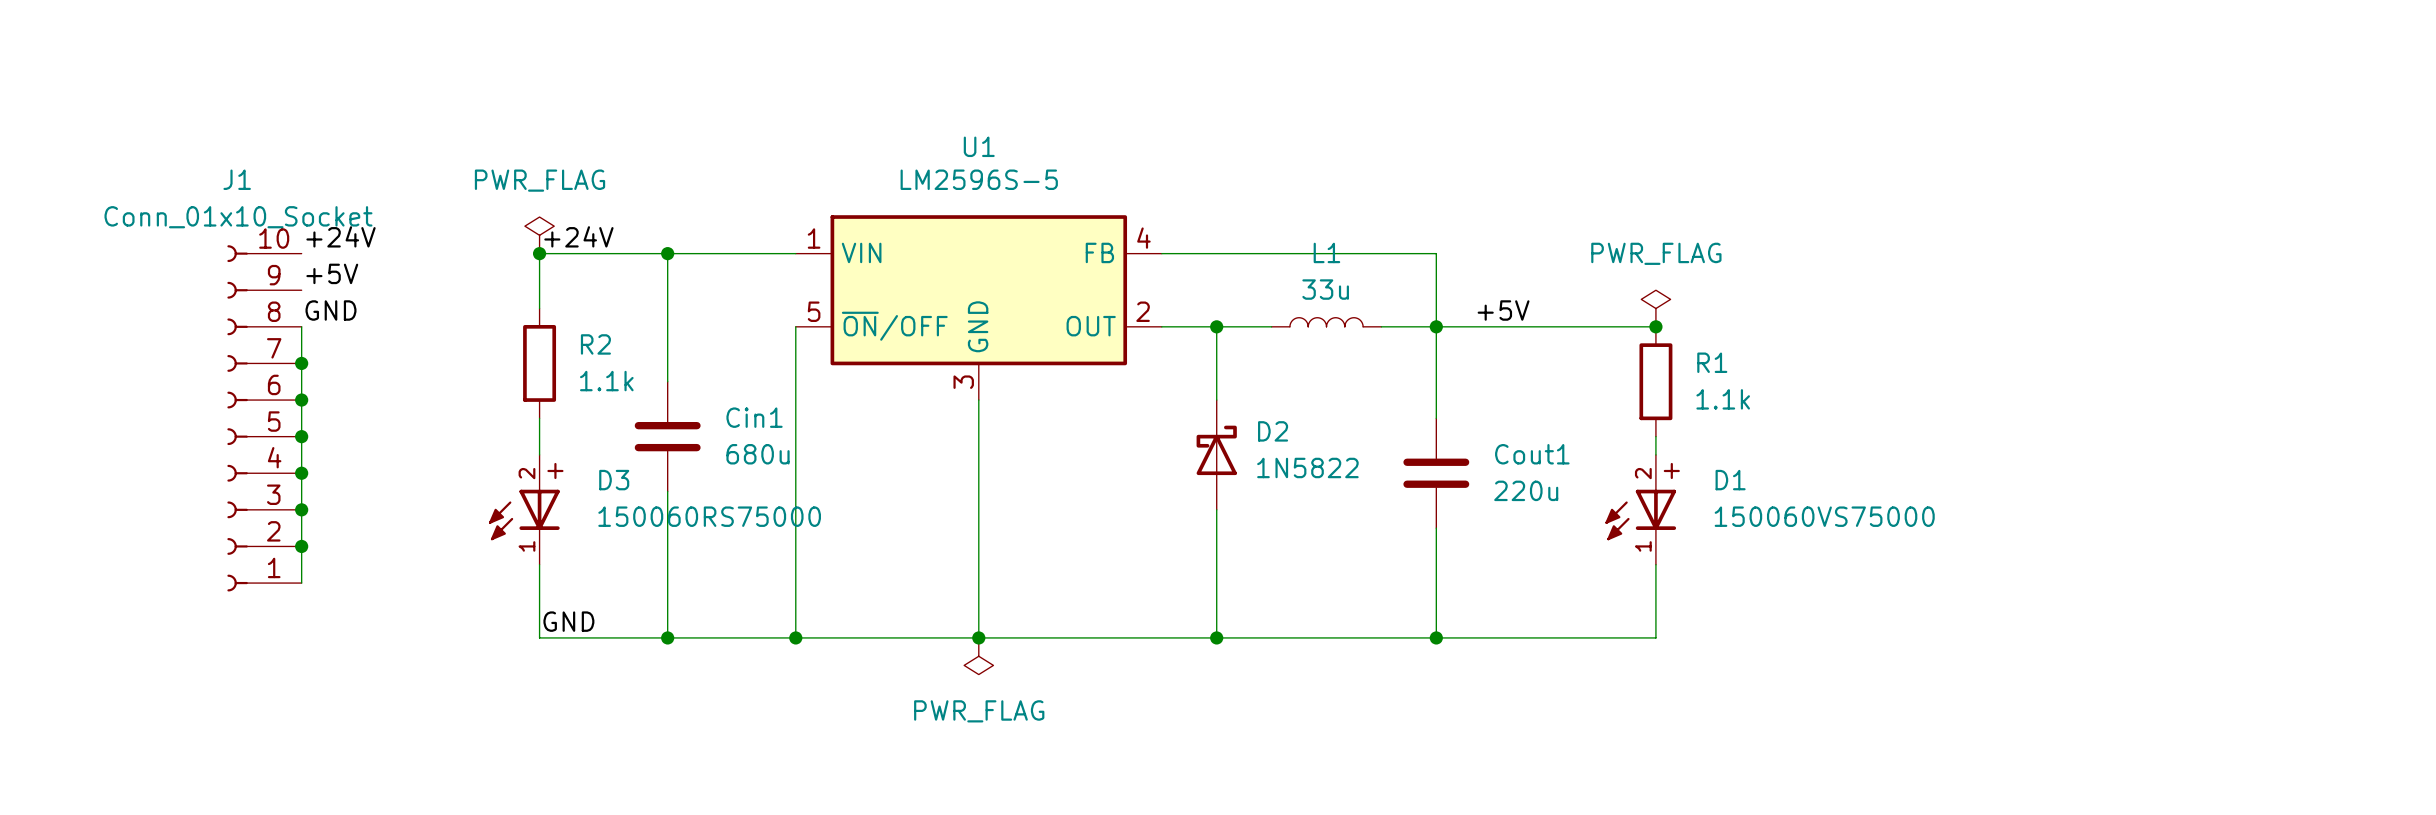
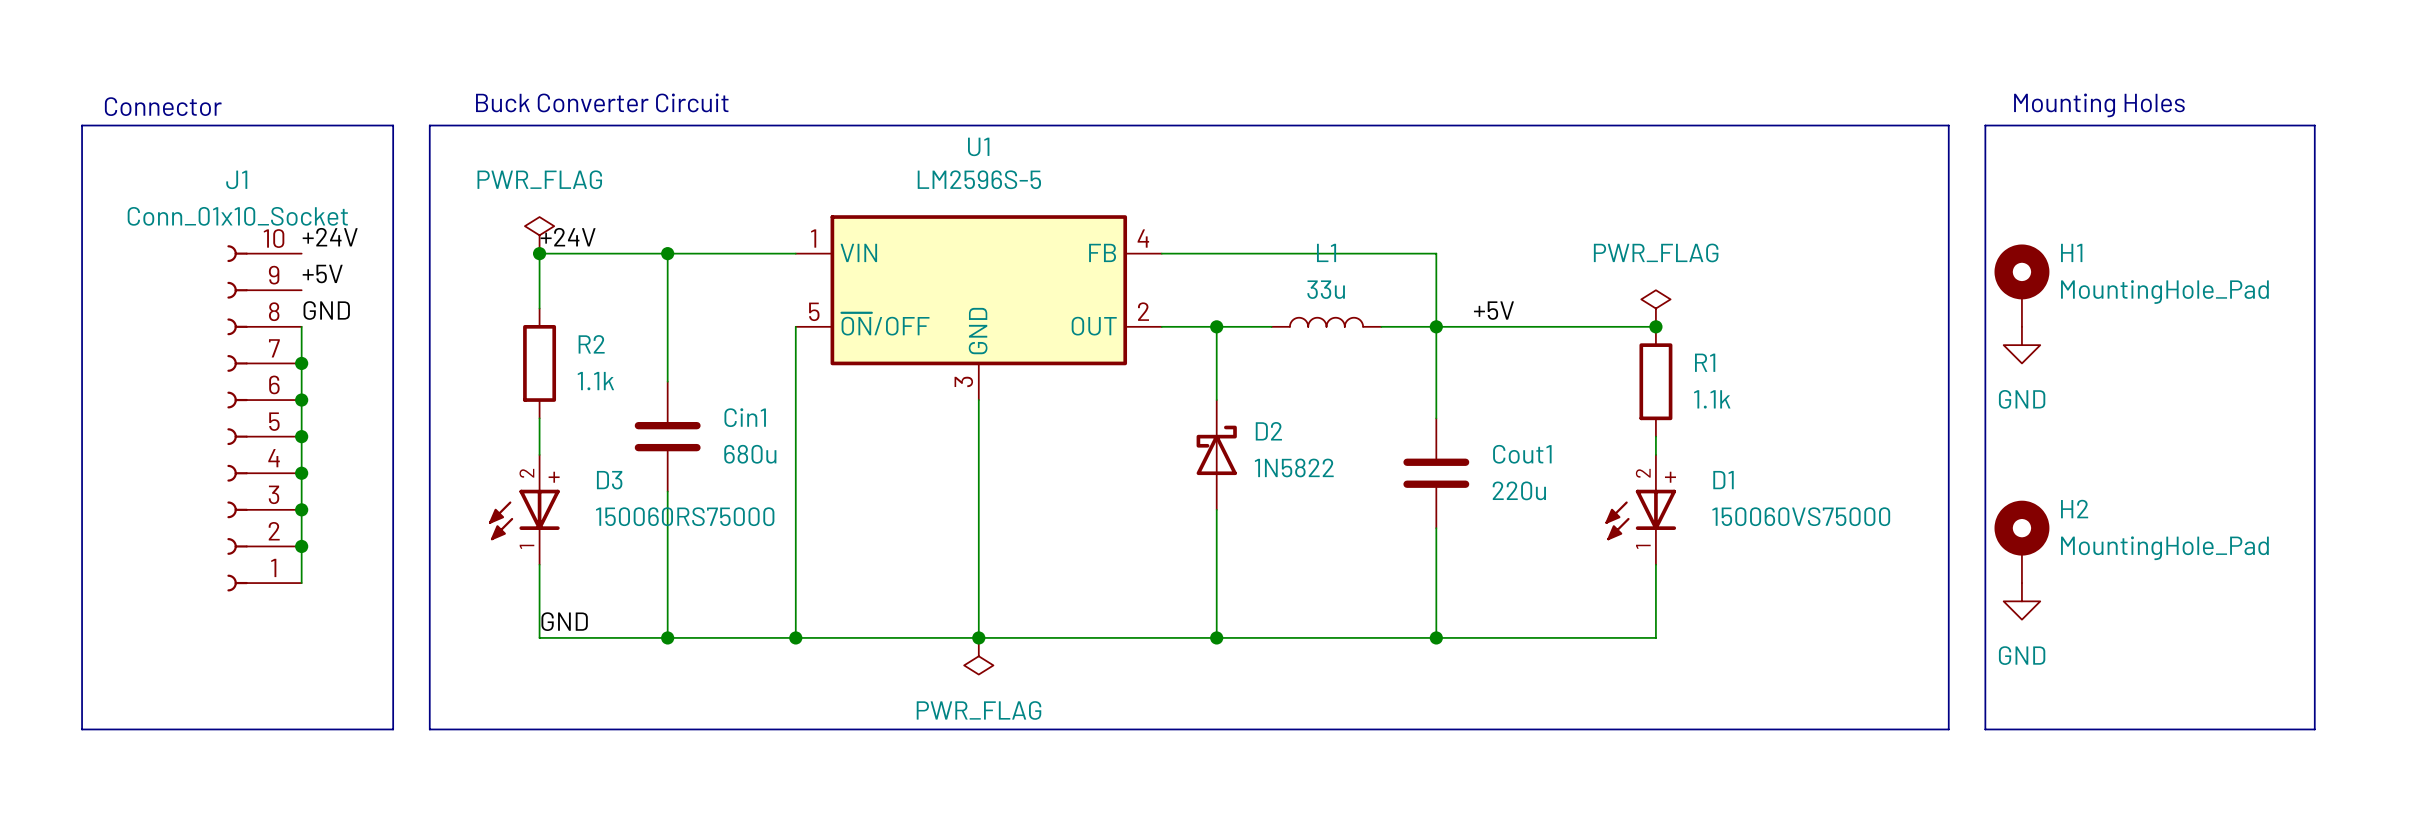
text: none -> Buck Converter Circuit (602, 102)
text: none -> Mounting Holes (2099, 105)
text: none -> Connector (163, 106)
line: none -> (82, 125) (393, 125) (393, 729) (82, 729) (82, 125)
line: none -> (429, 125) (1948, 125) (1948, 729) (429, 729) (429, 125)
line: none -> (1985, 125) (2314, 125) (2314, 729) (1985, 729) (1985, 125)
H1: none -> MountingHole_Pad (2021, 285)
power symbol: none -> GND (2021, 345)
H2: none -> MountingHole_Pad (2021, 541)
power symbol: none -> GND (2021, 601)

